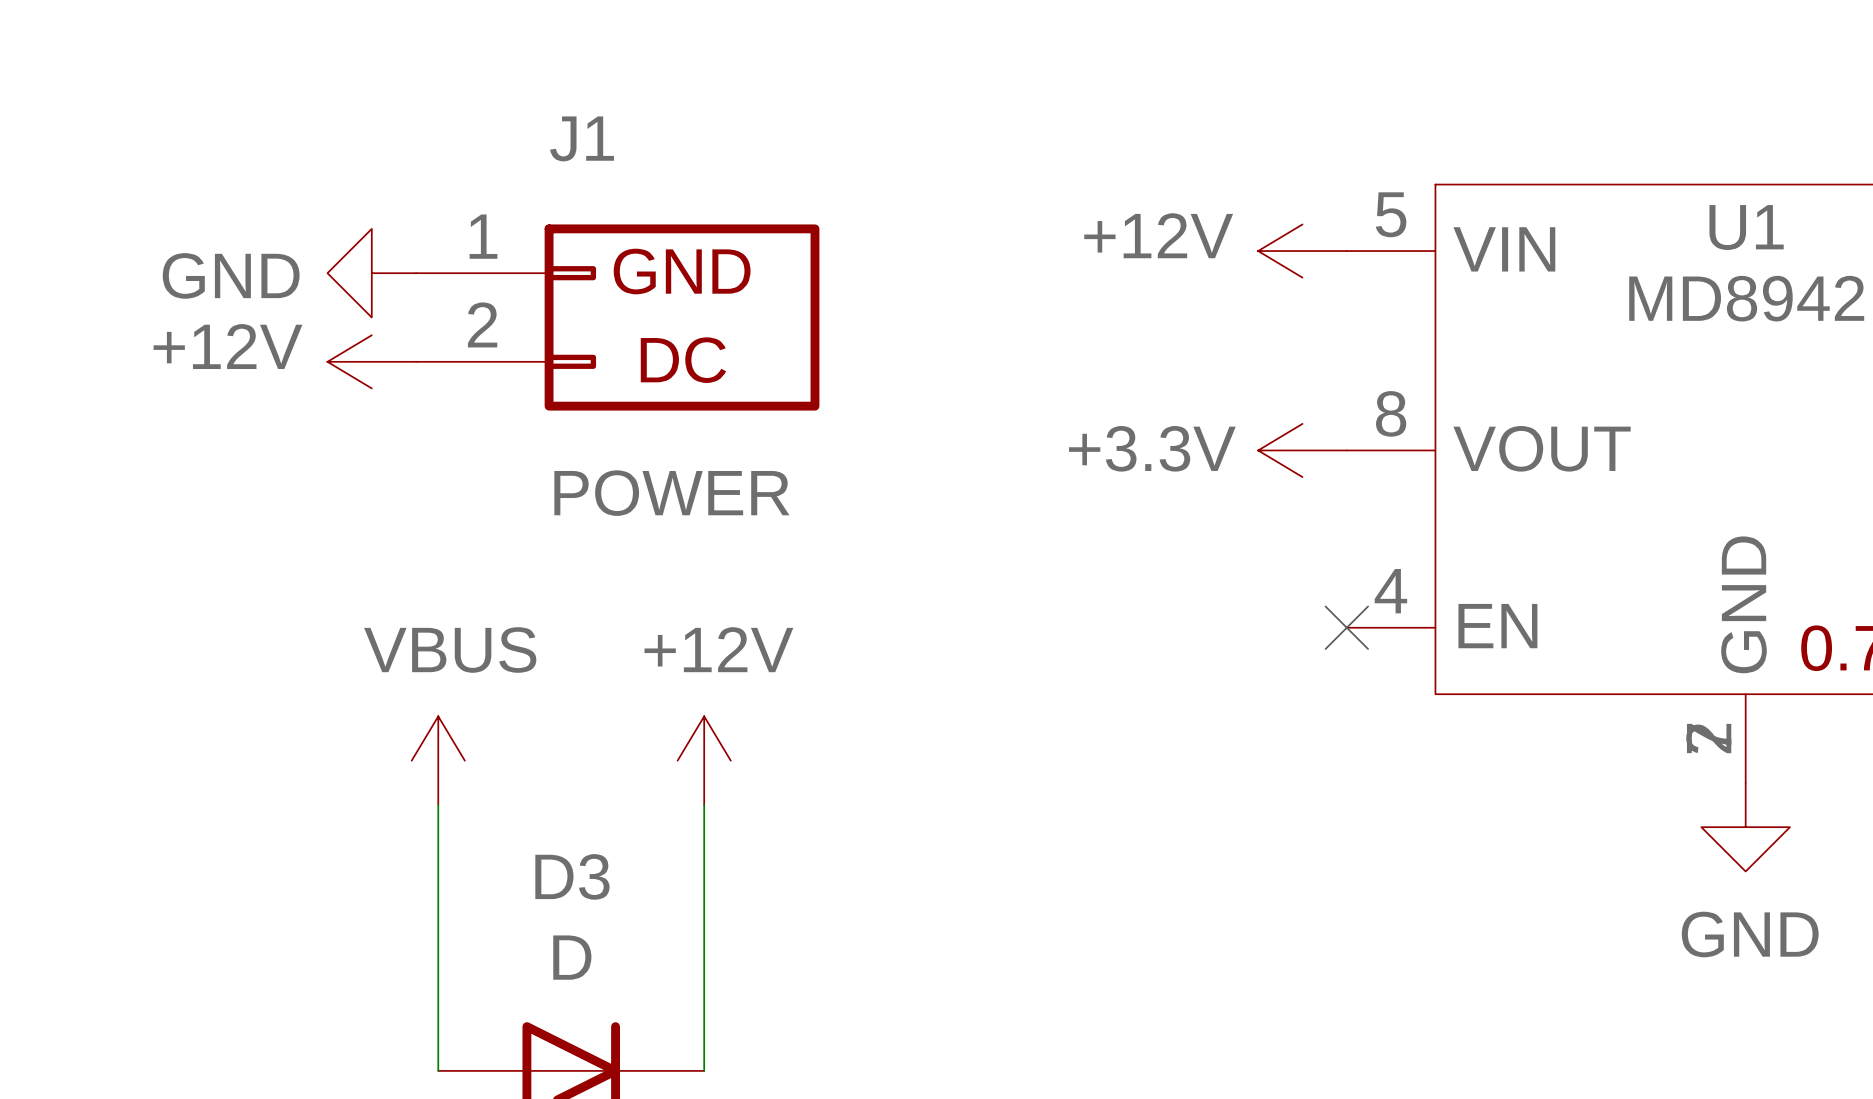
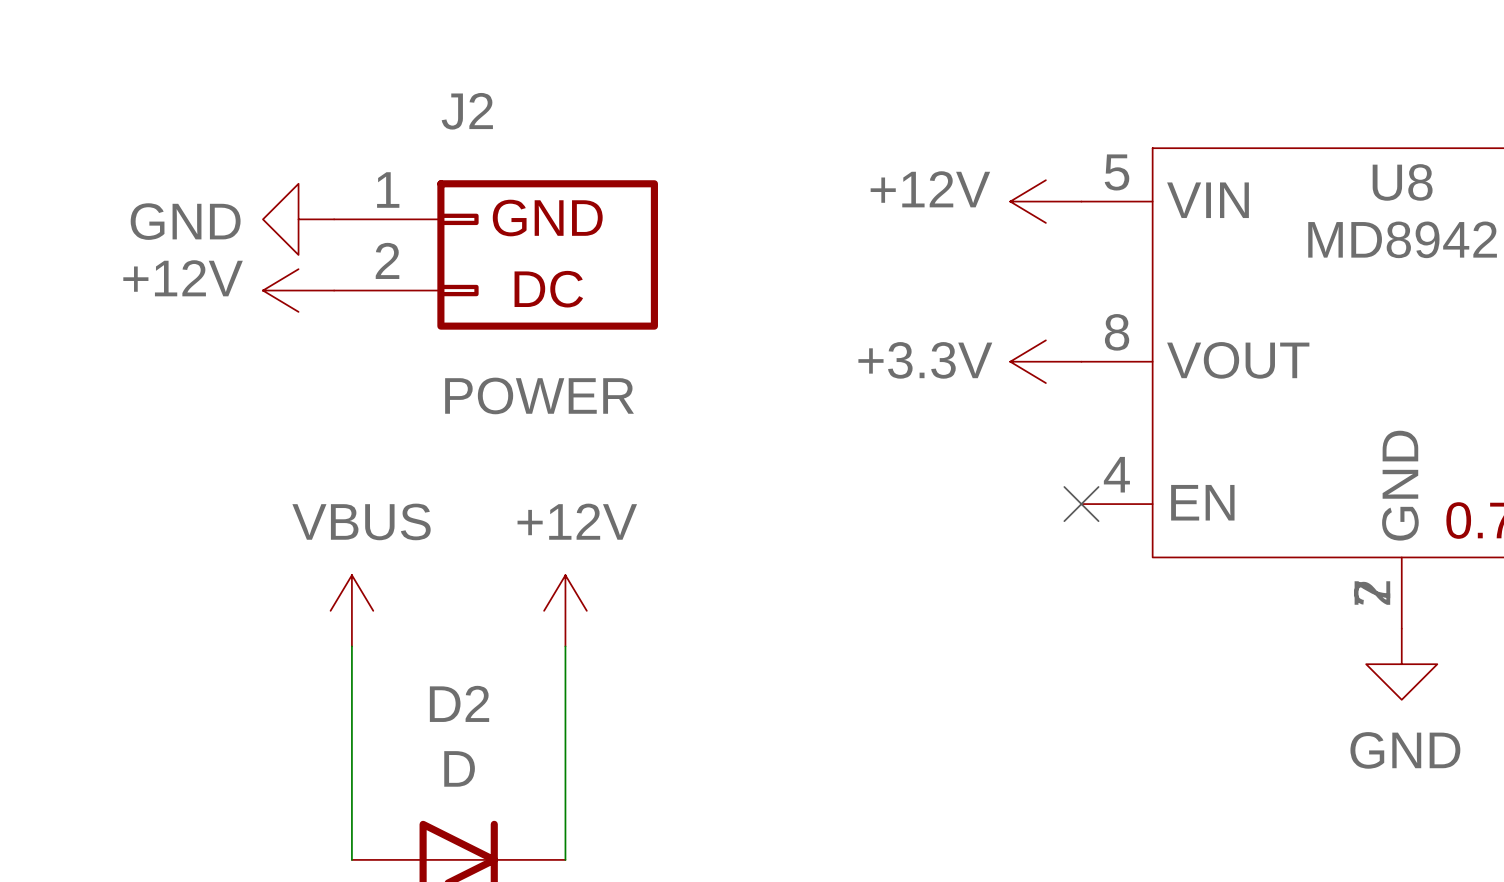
J1 name: J1 (582, 138) -> J2 (467, 111)
U1 name: U1 (1746, 227) -> U8 (1402, 182)
D3 name: D3 (572, 876) -> D2 (459, 703)

